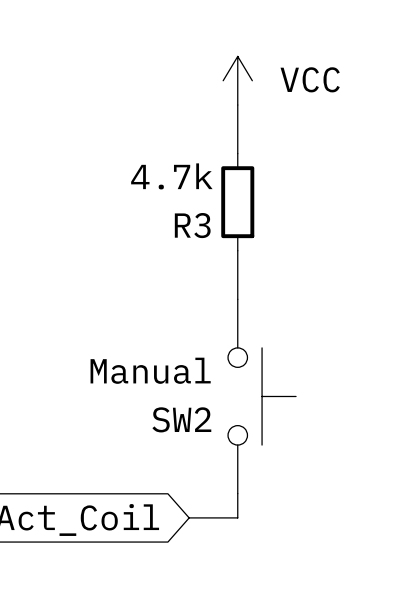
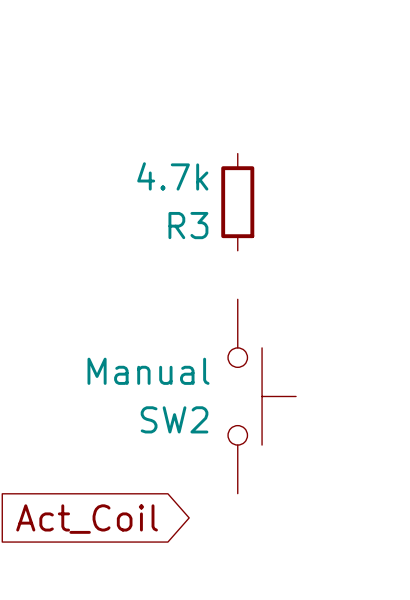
power symbol: VCC (237, 80) -> none
wire: (237, 105) (237, 153) -> none
wire: (237, 250) (237, 299) -> none
wire: (237, 493) (237, 517) (189, 517) -> none

